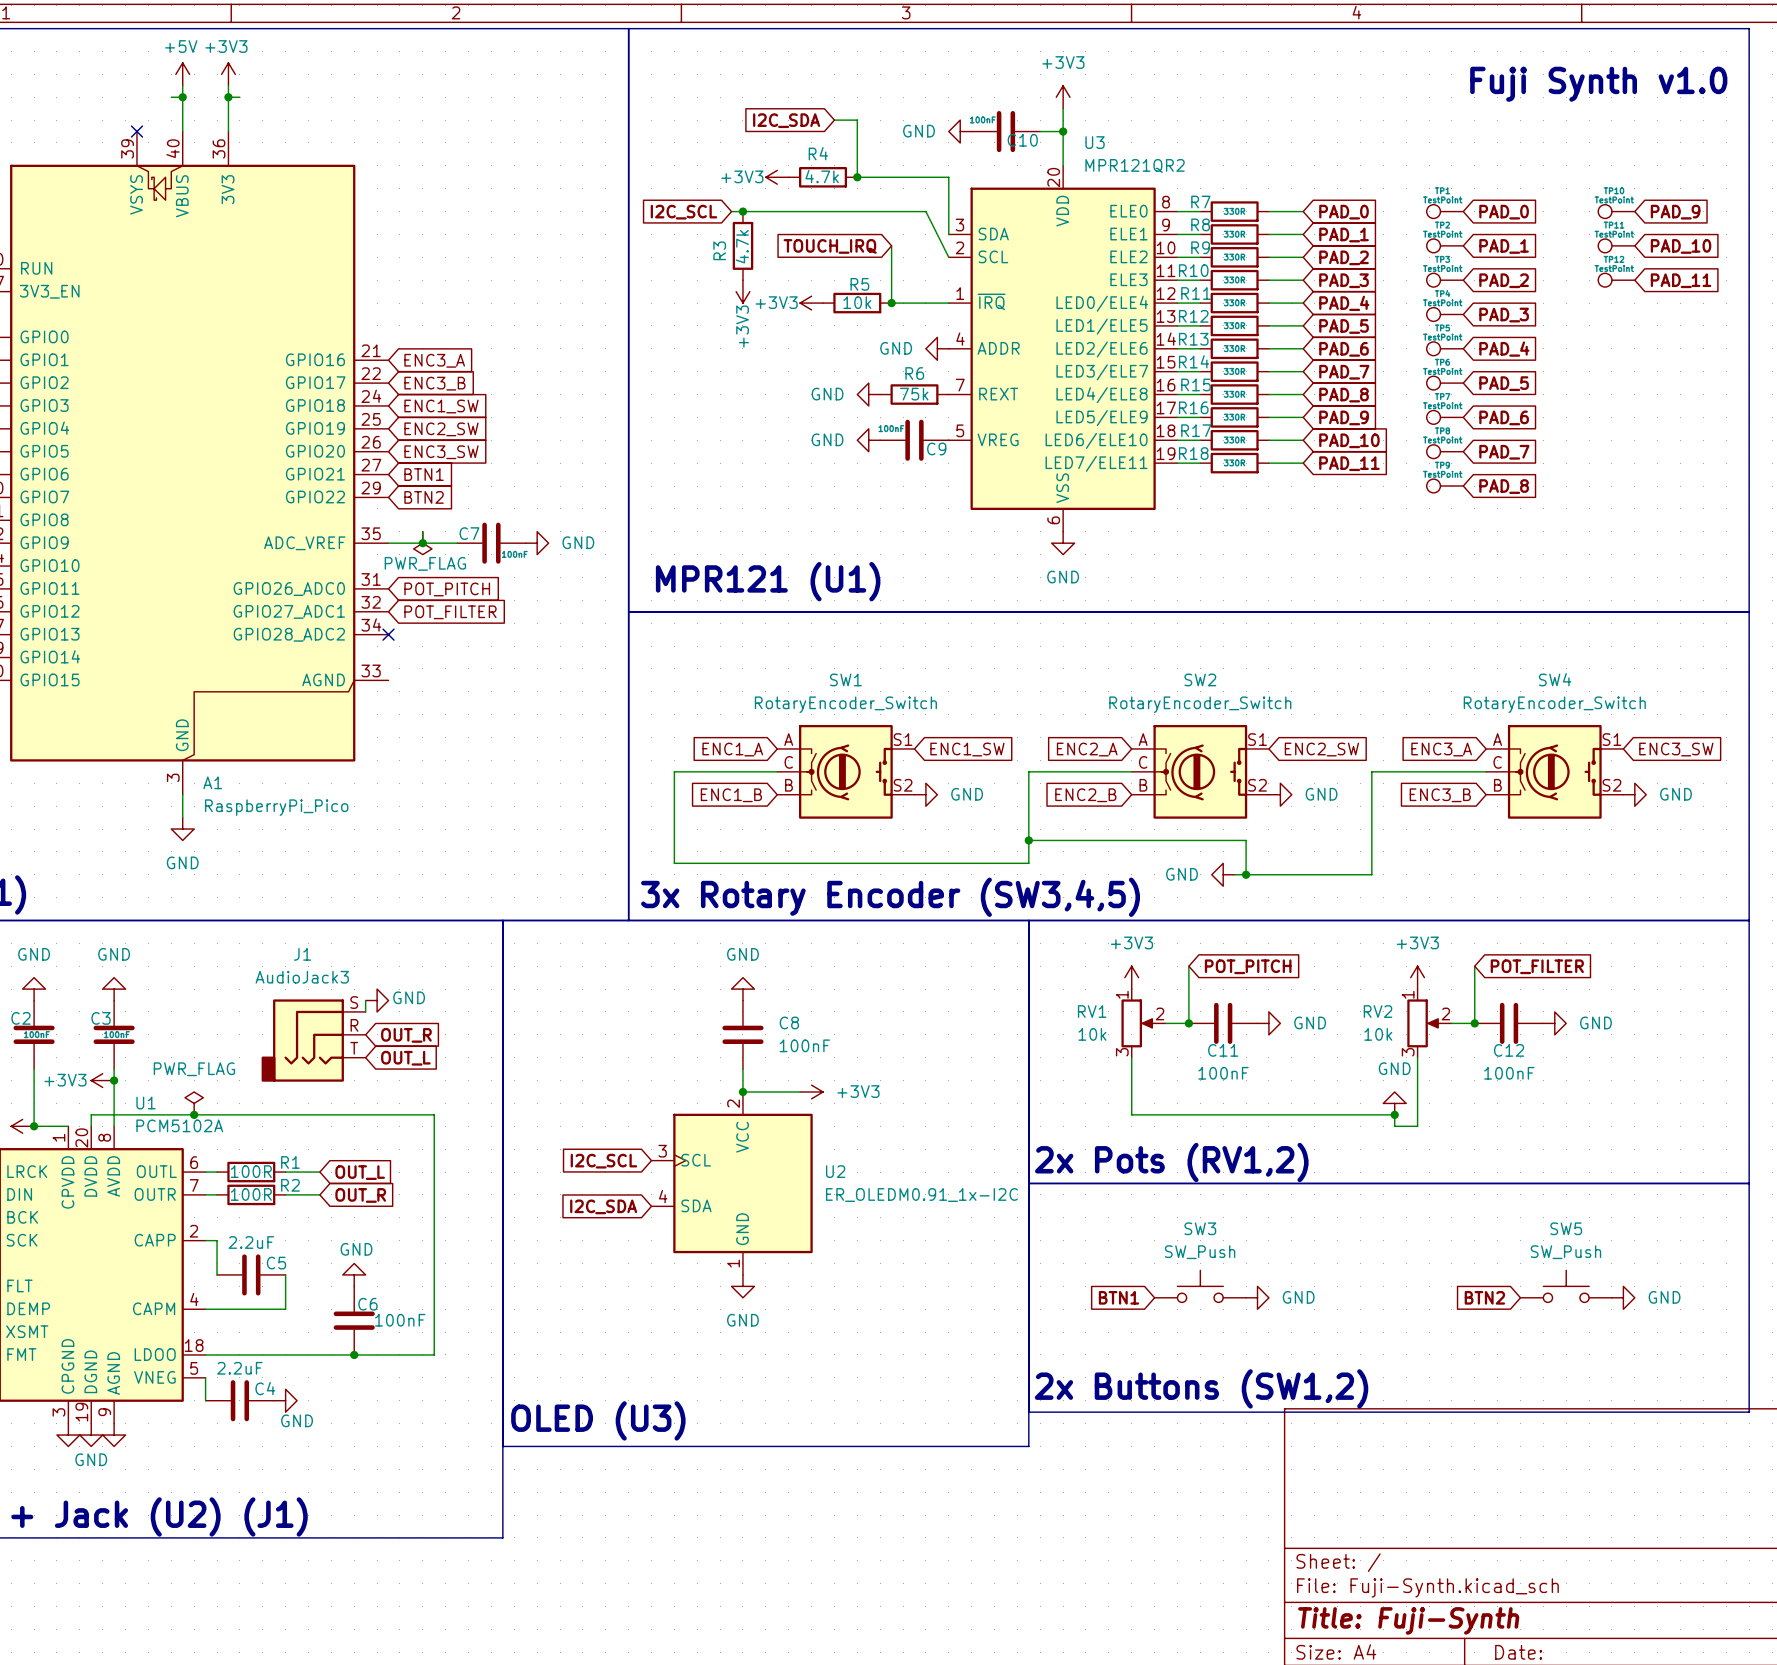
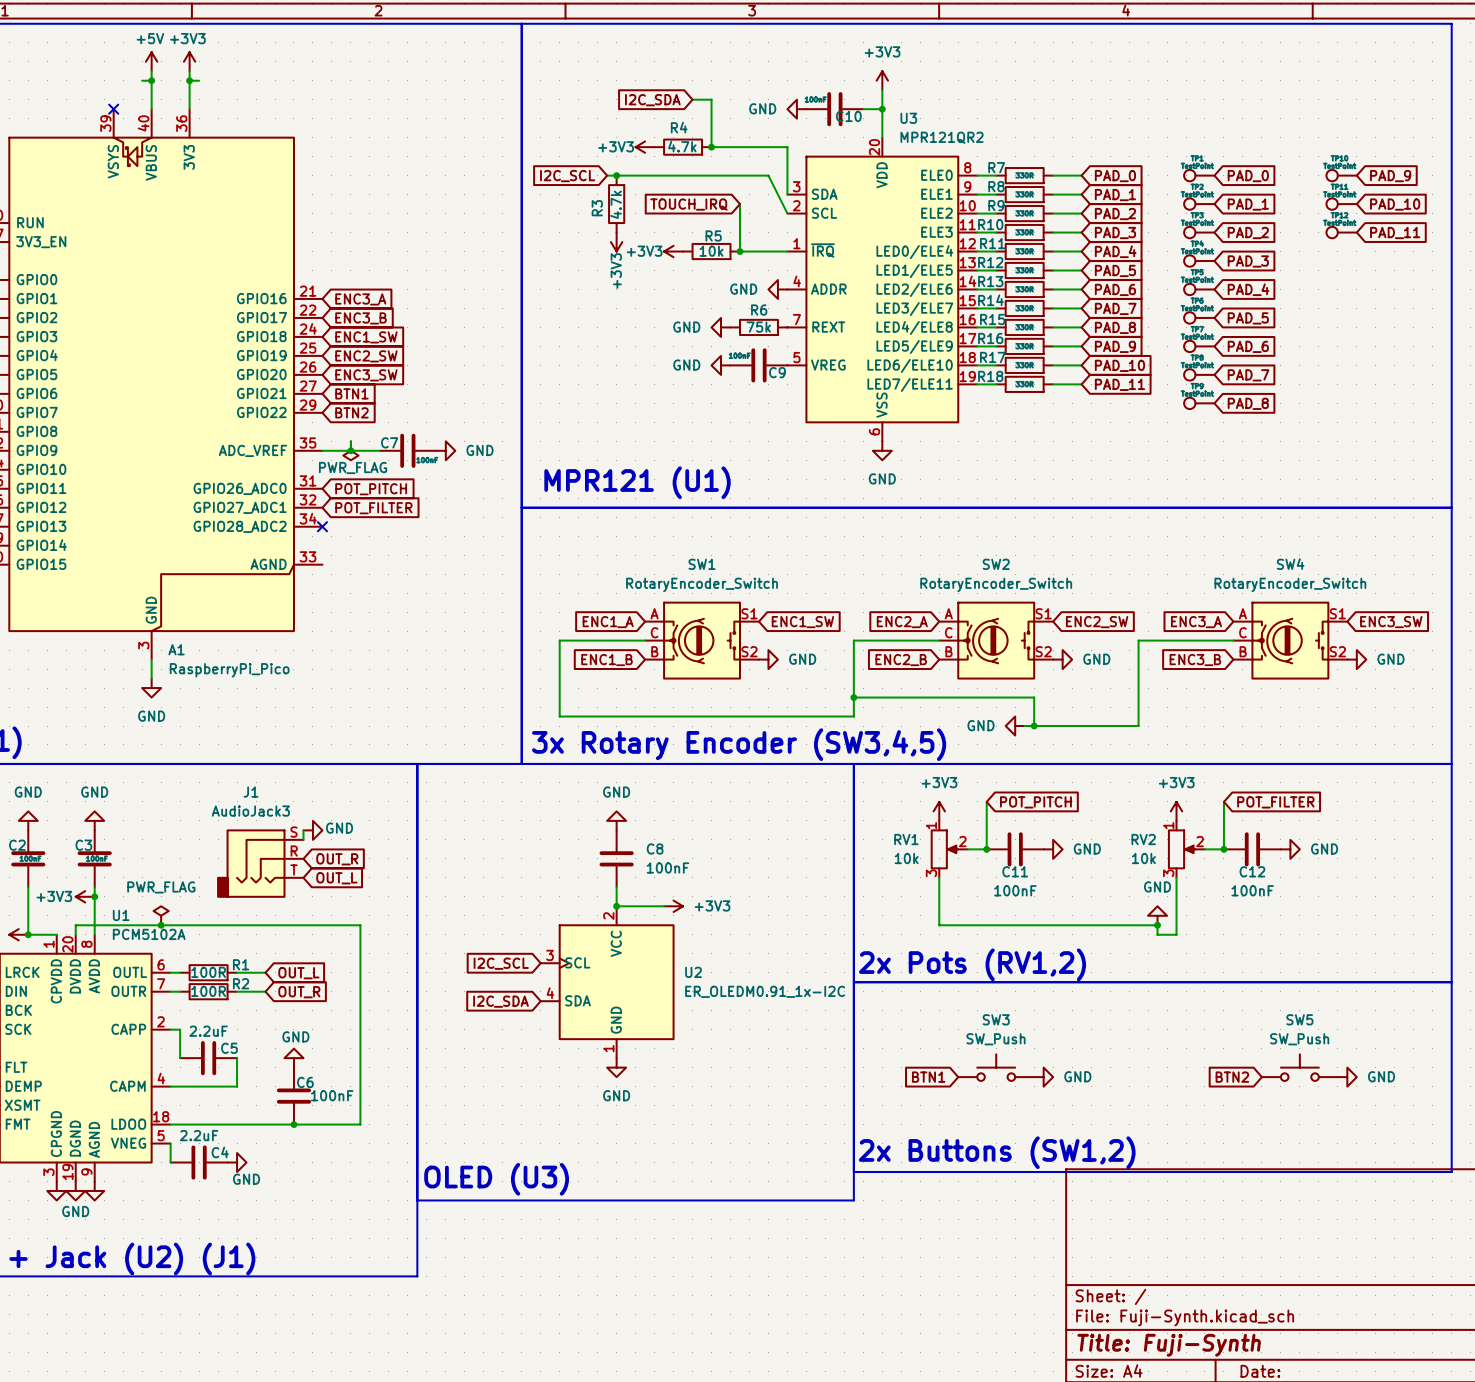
text: Fuji Synth v1.0 (1598, 84) -> none

